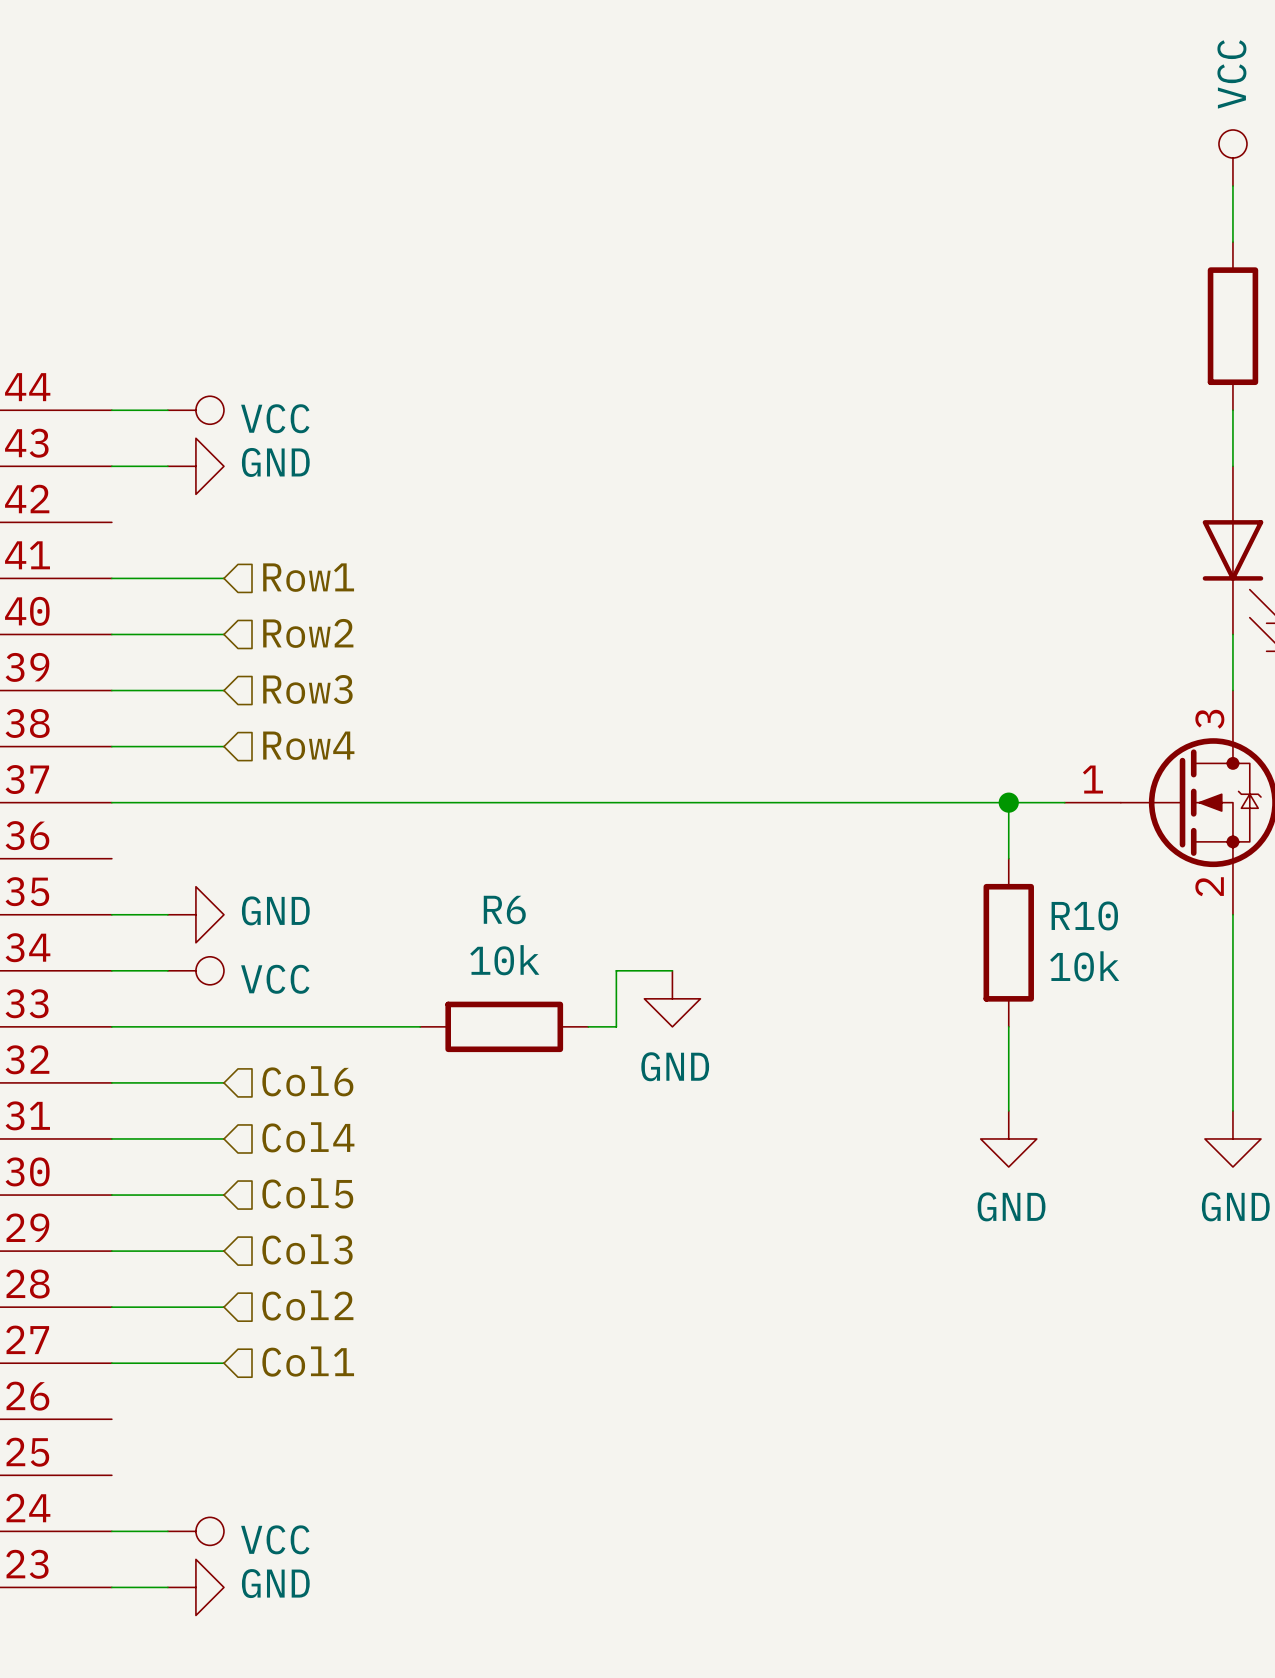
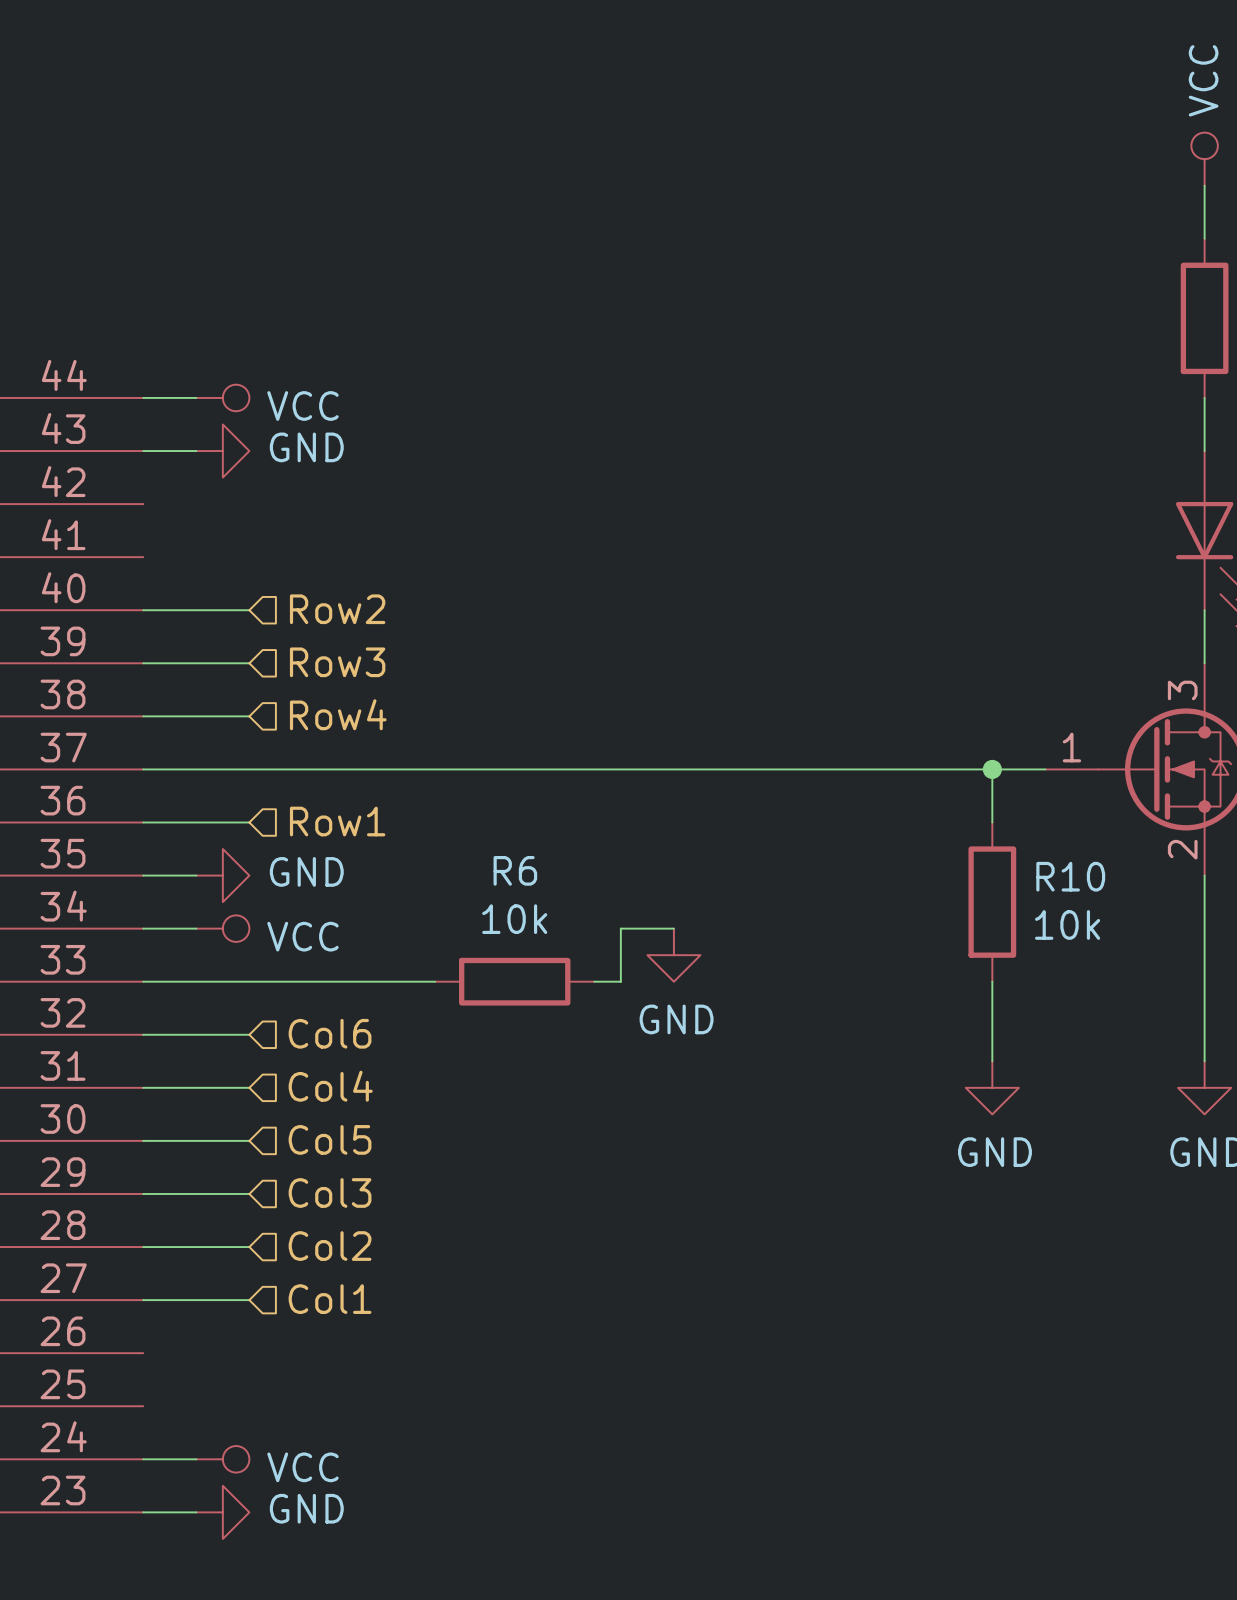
hierarchical label position: Row1 (308, 577) -> Row1 (337, 821)
wire: (111, 578) (223, 578) -> (143, 822) (249, 822)

